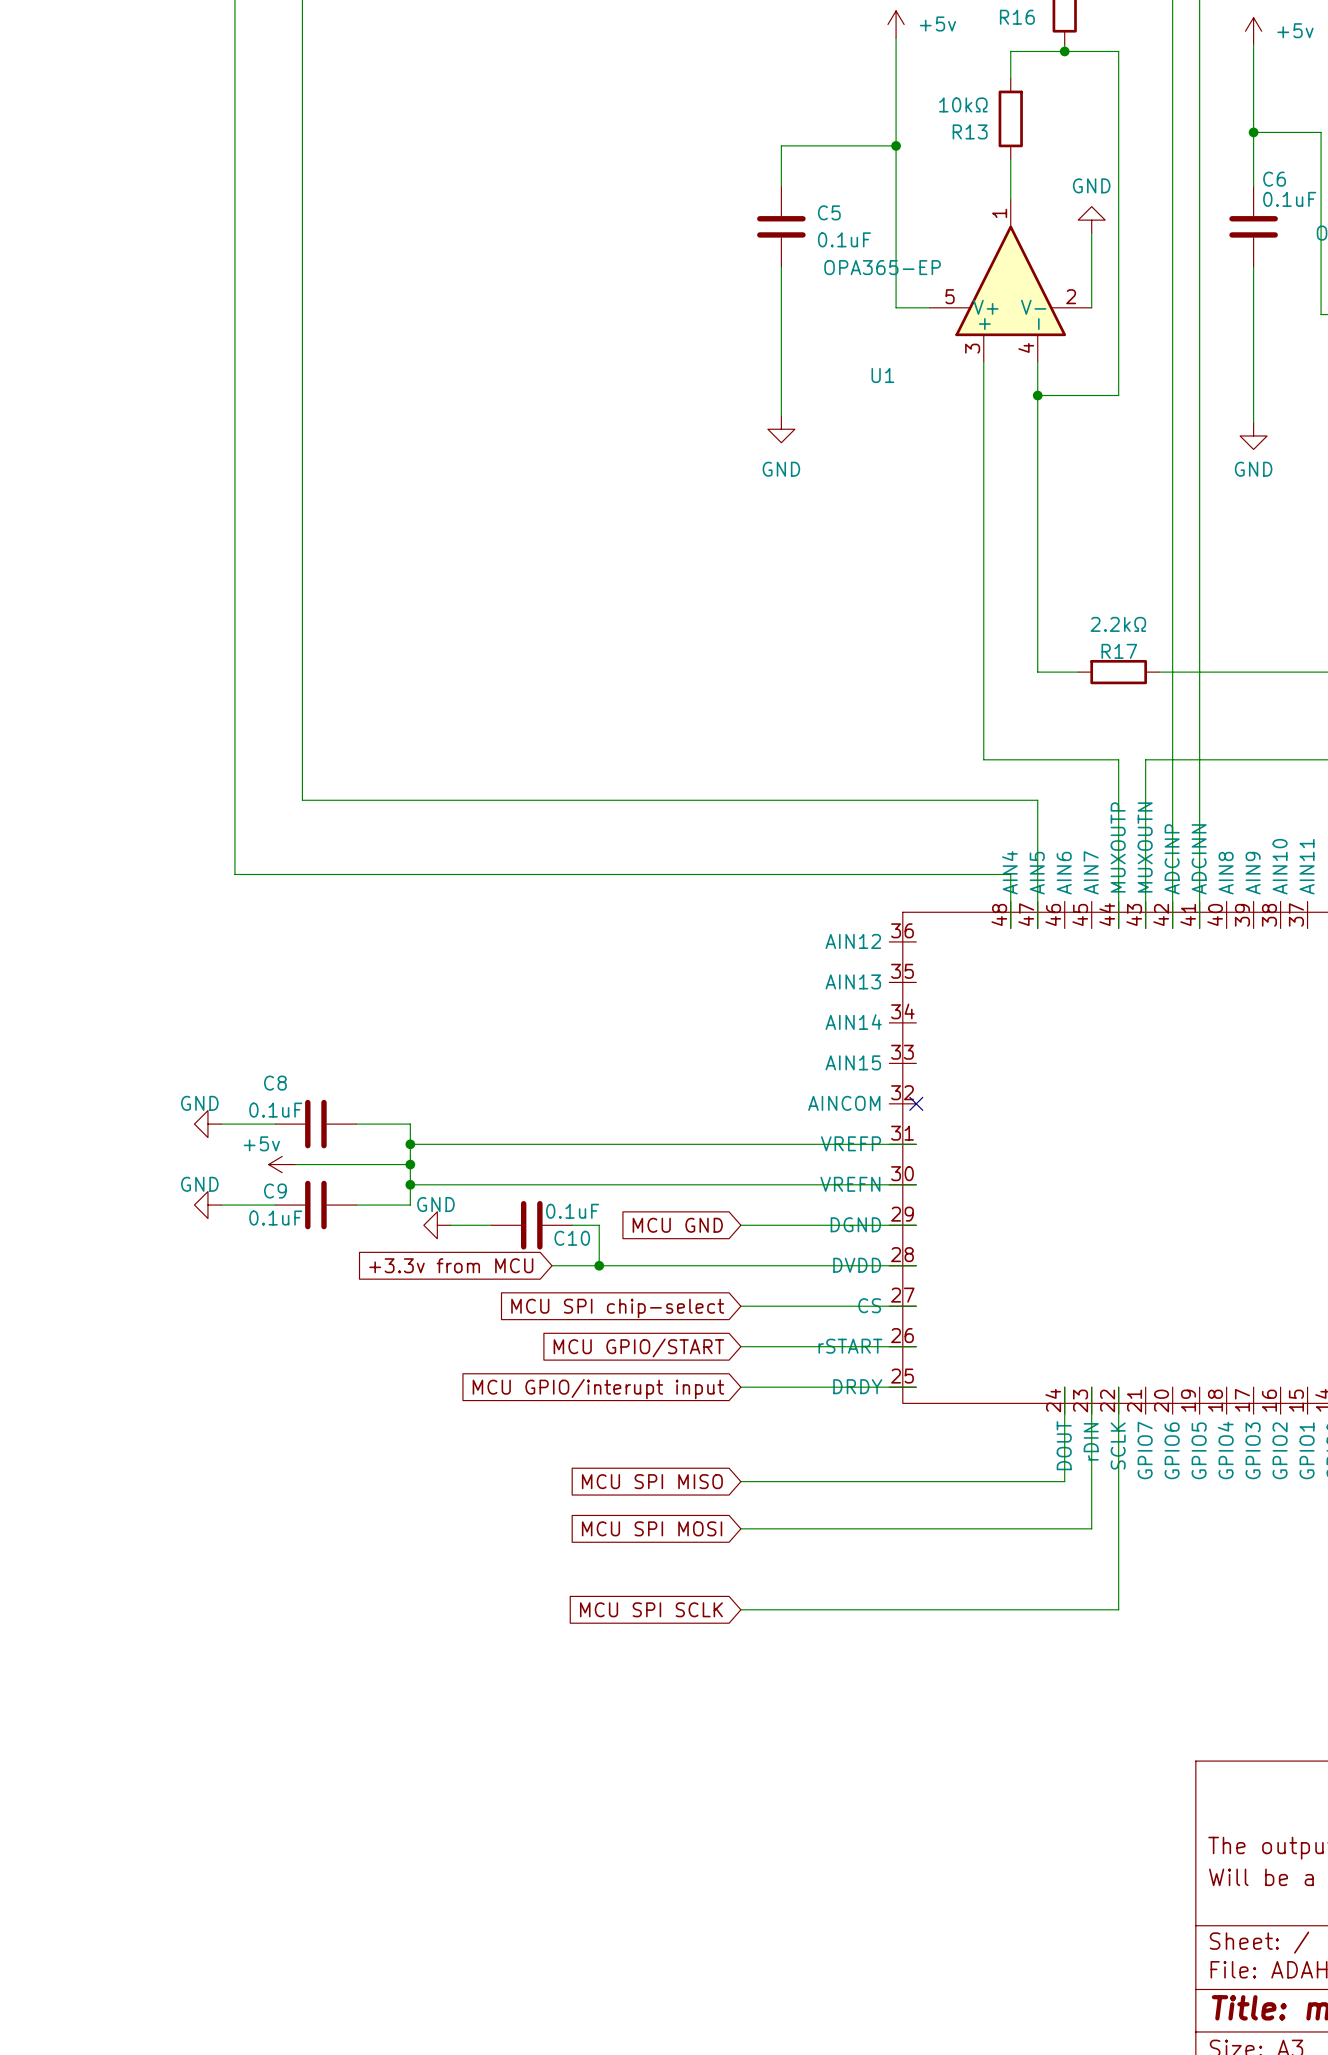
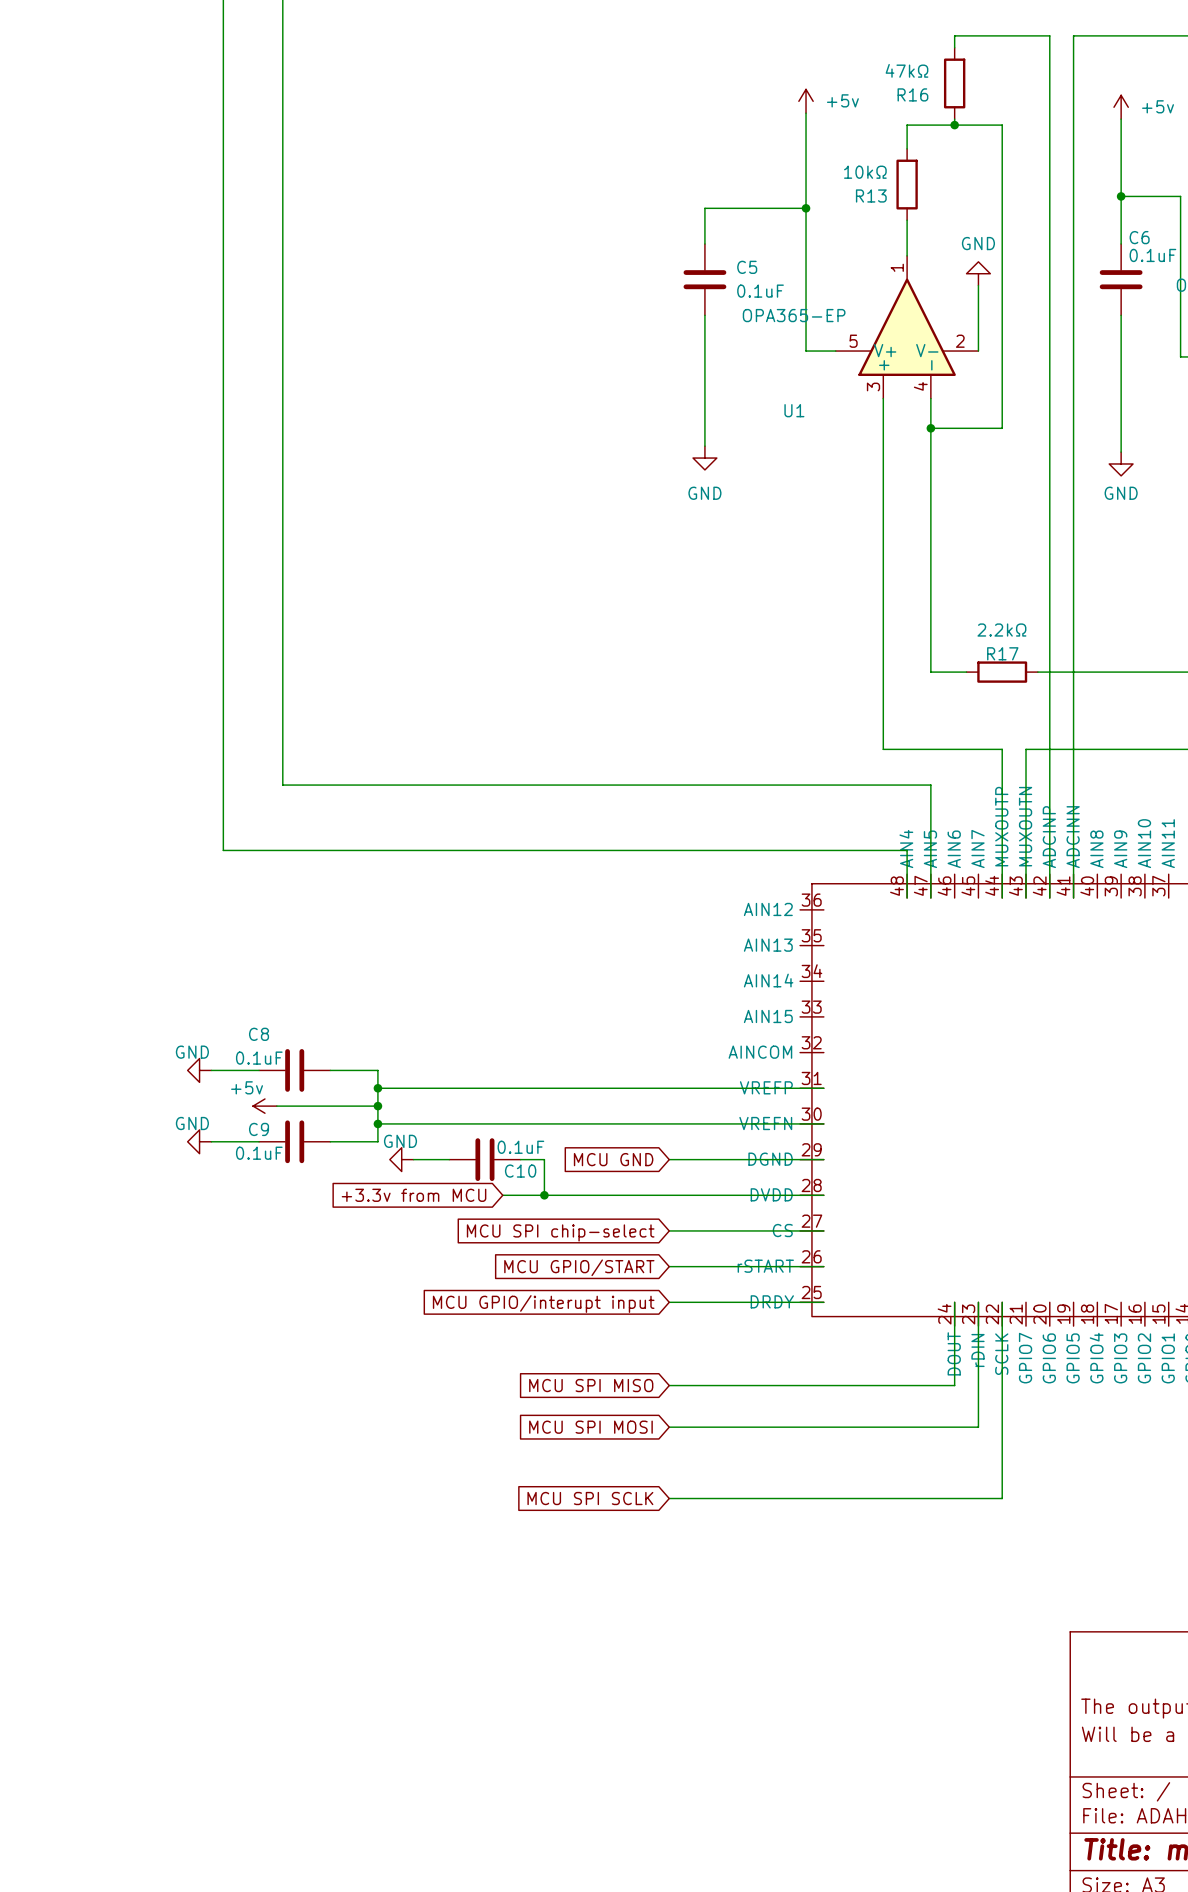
no-connect mark: (916, 1103) -> none

